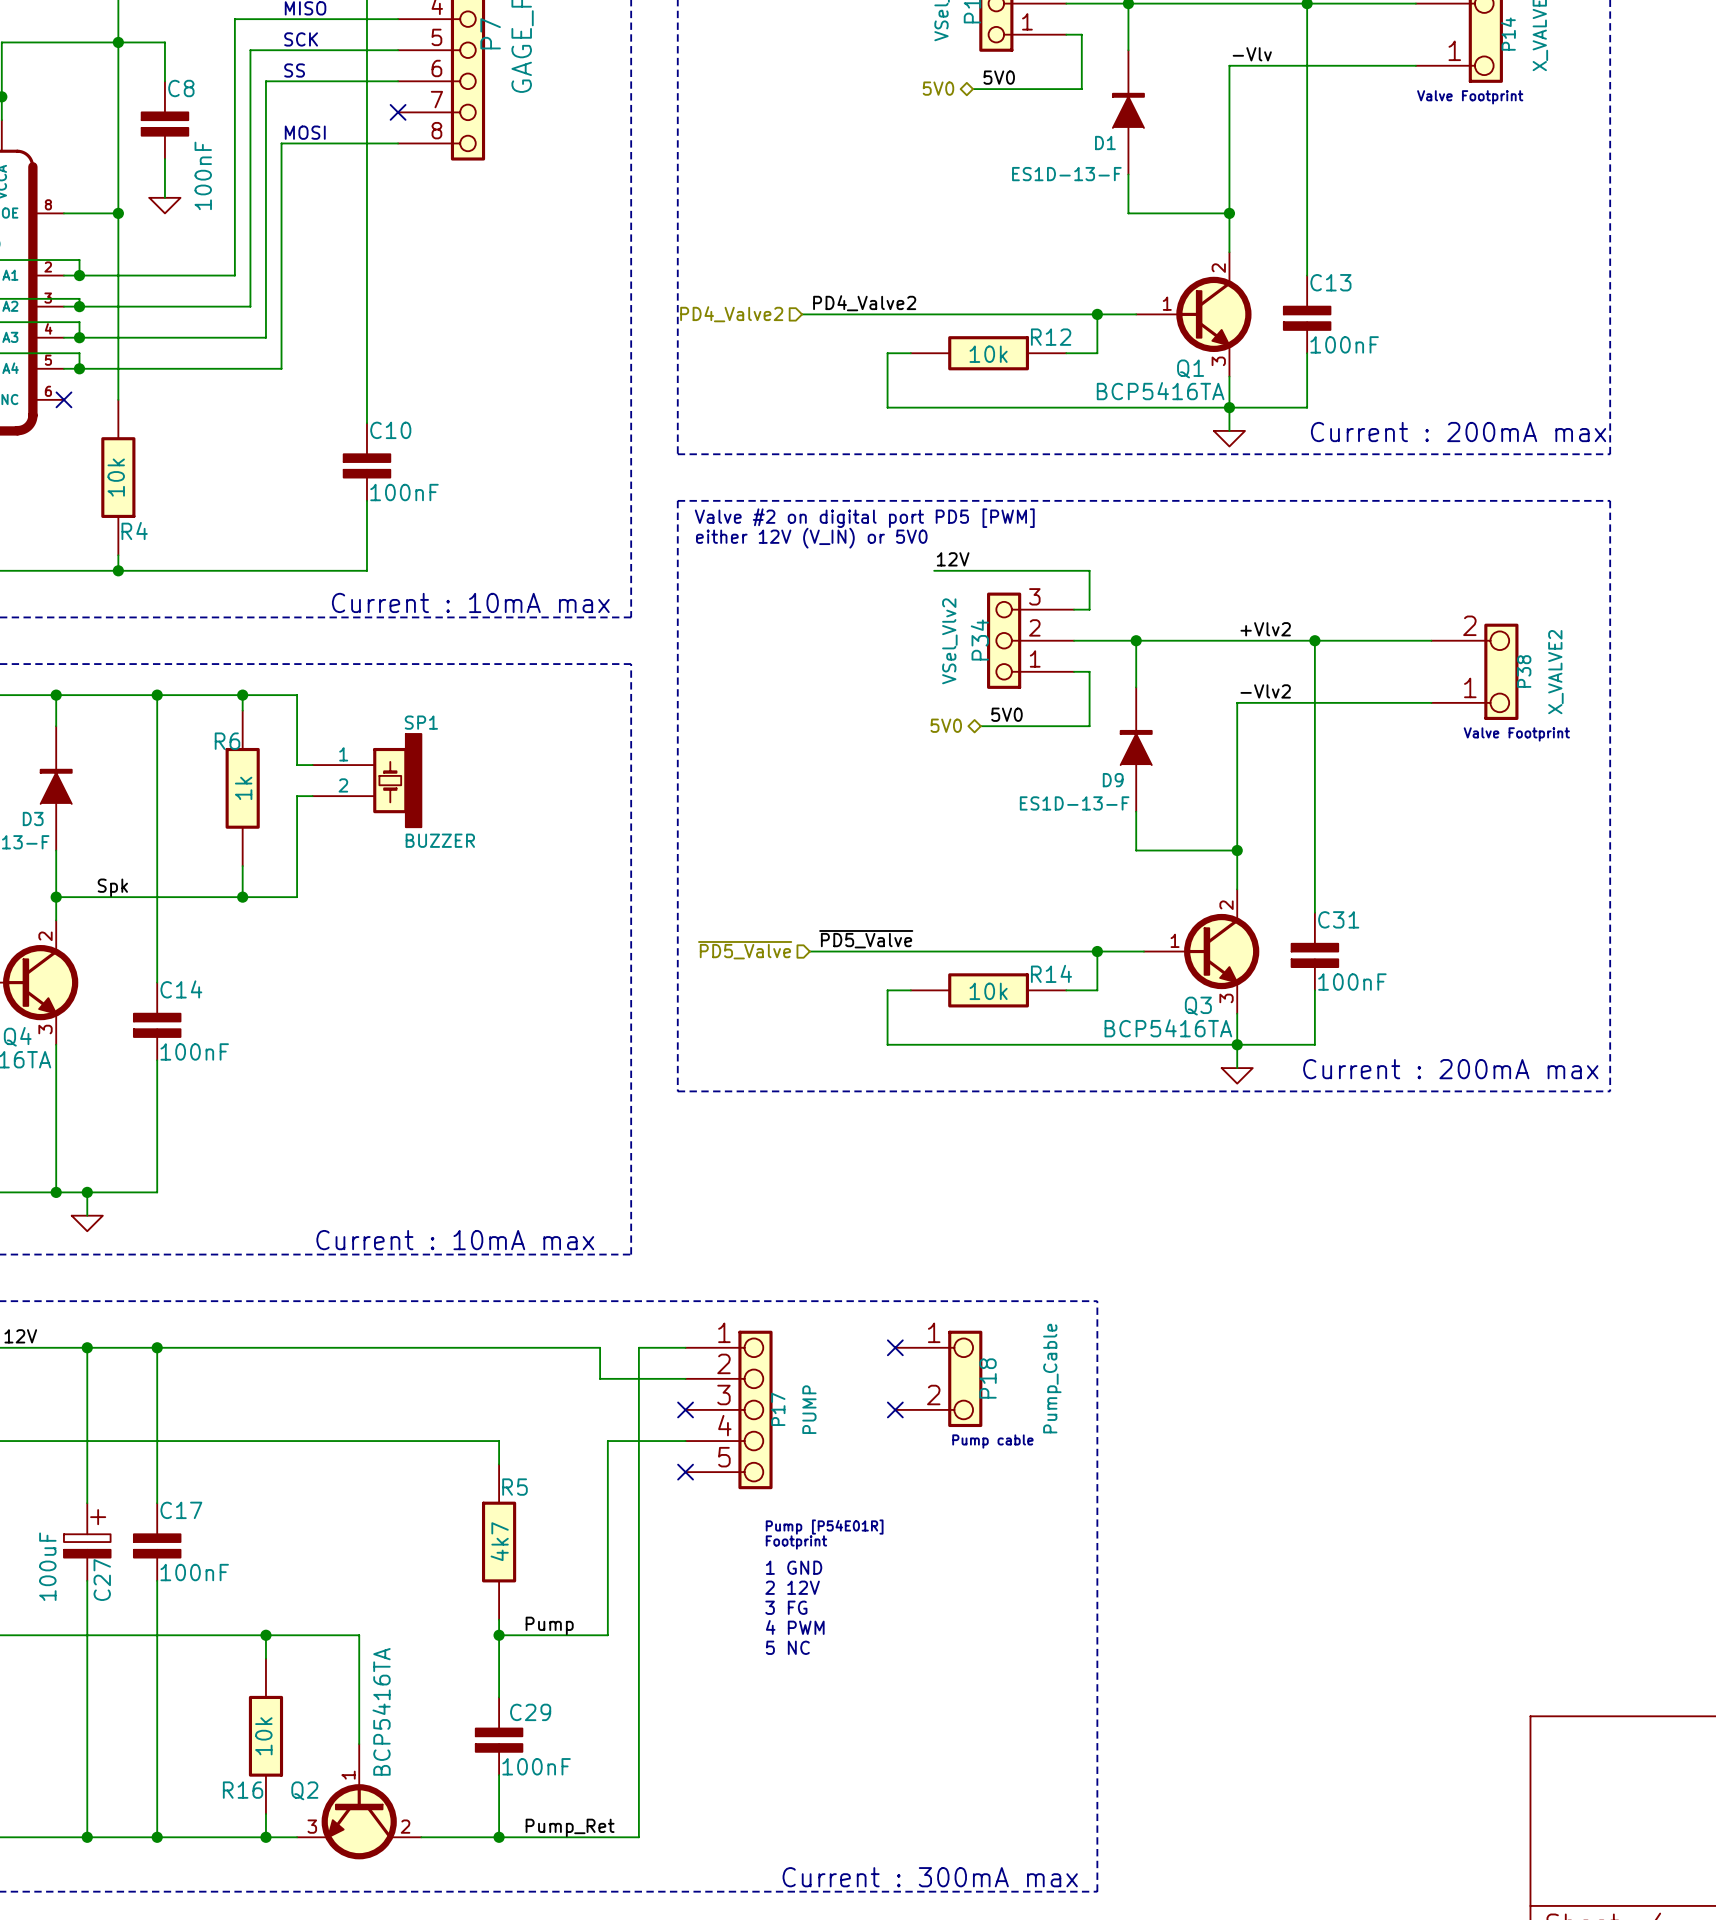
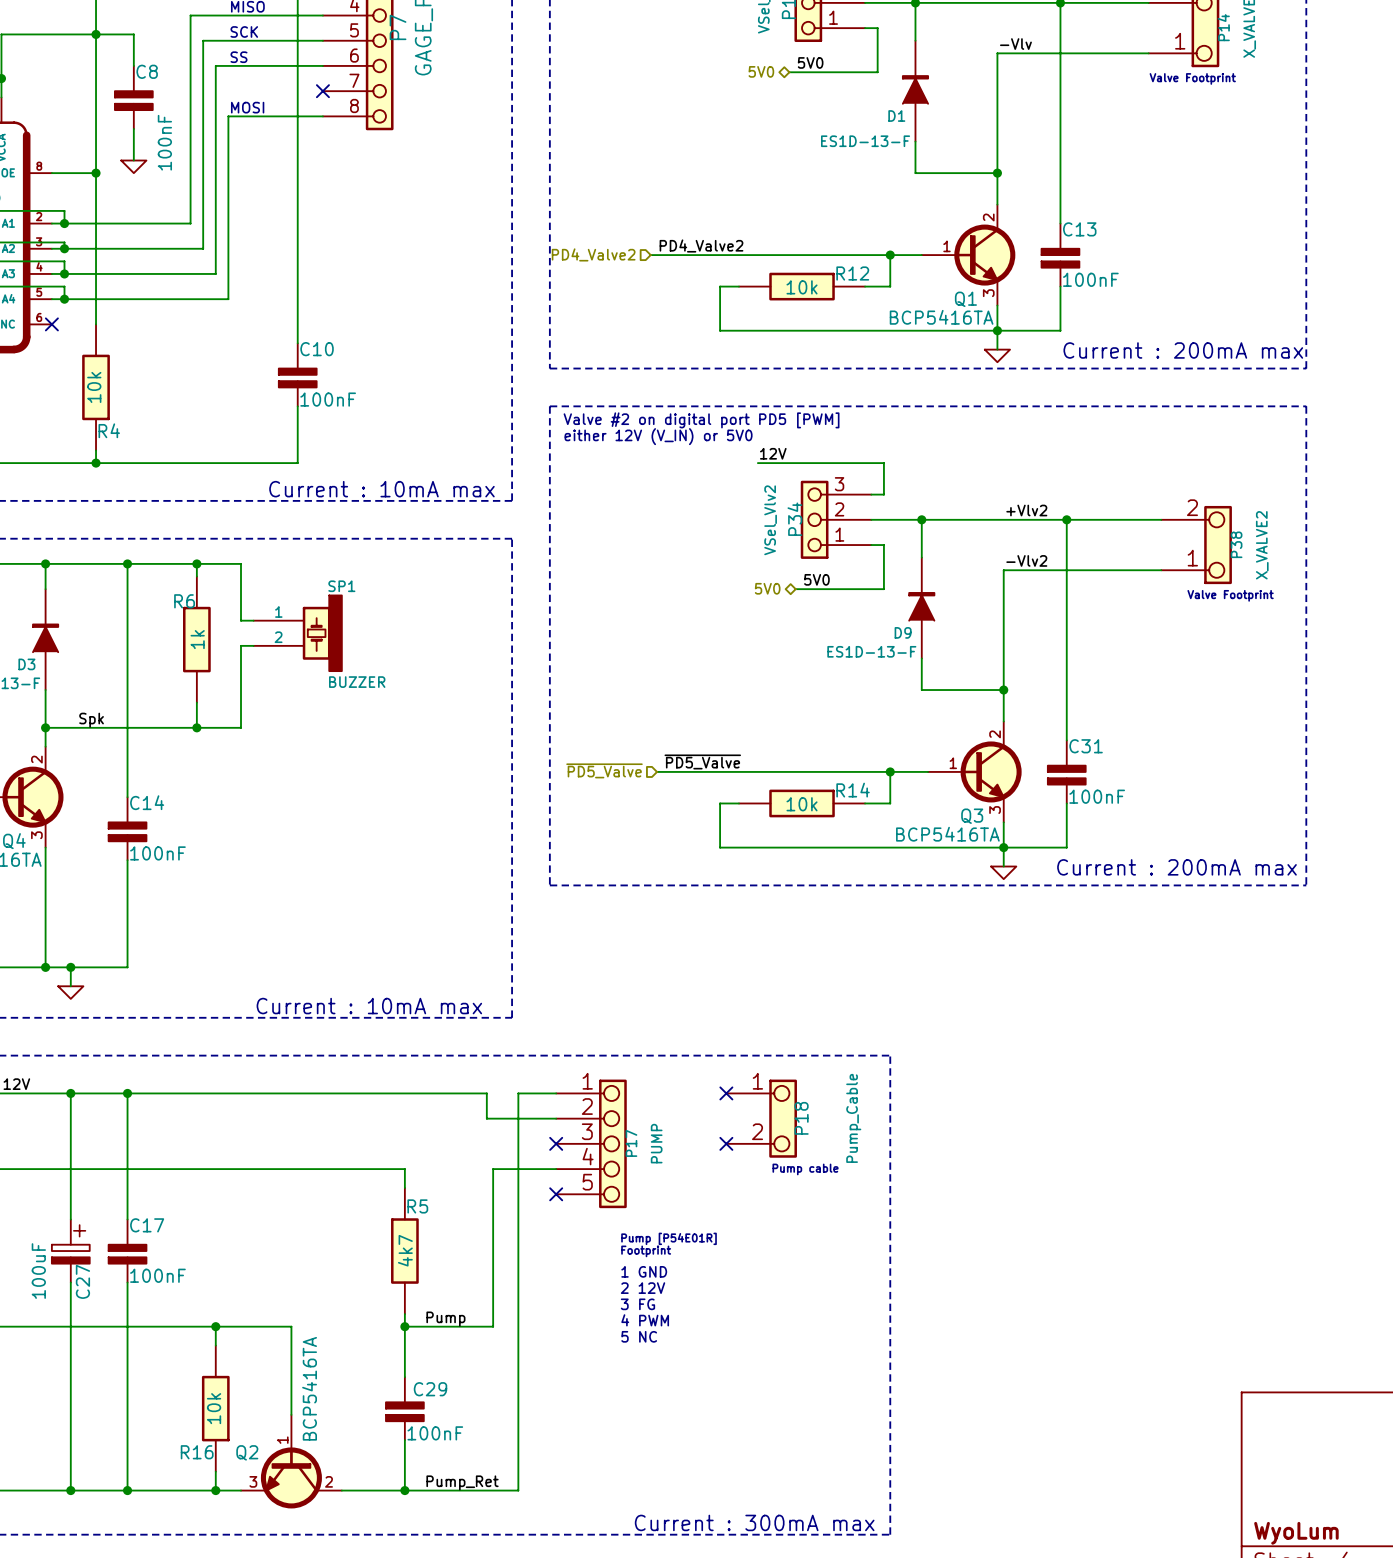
title block: none -> WyoLum (1296, 1533)

